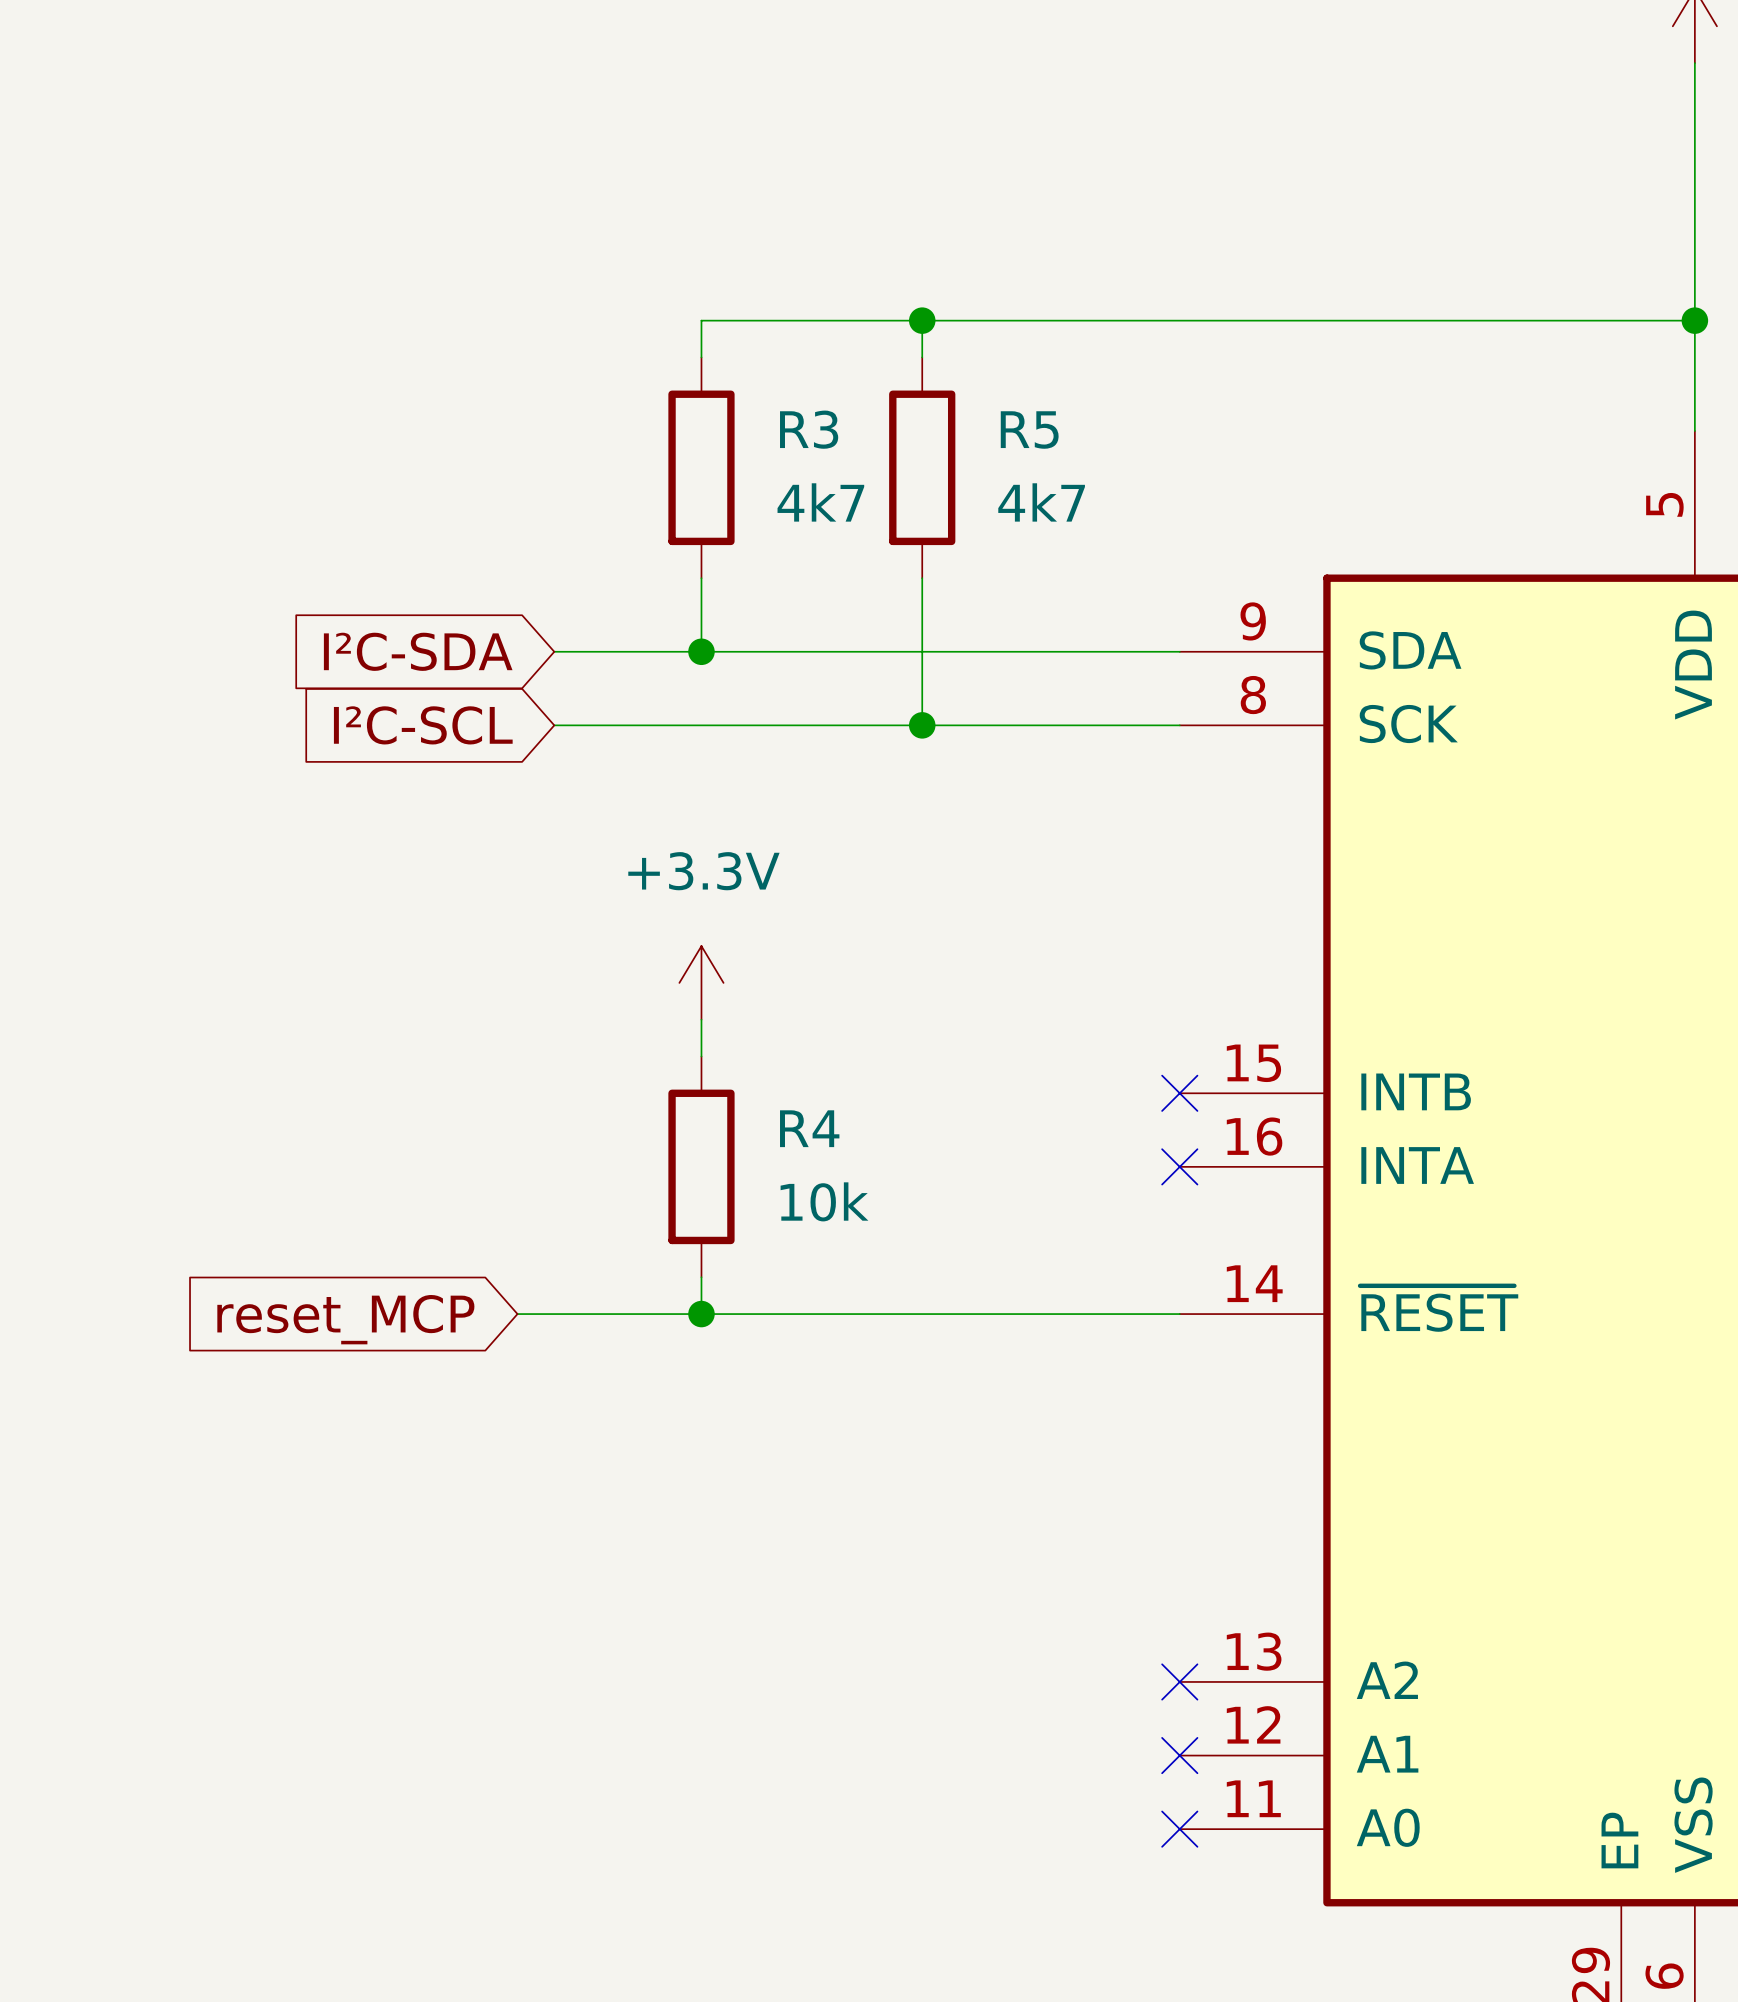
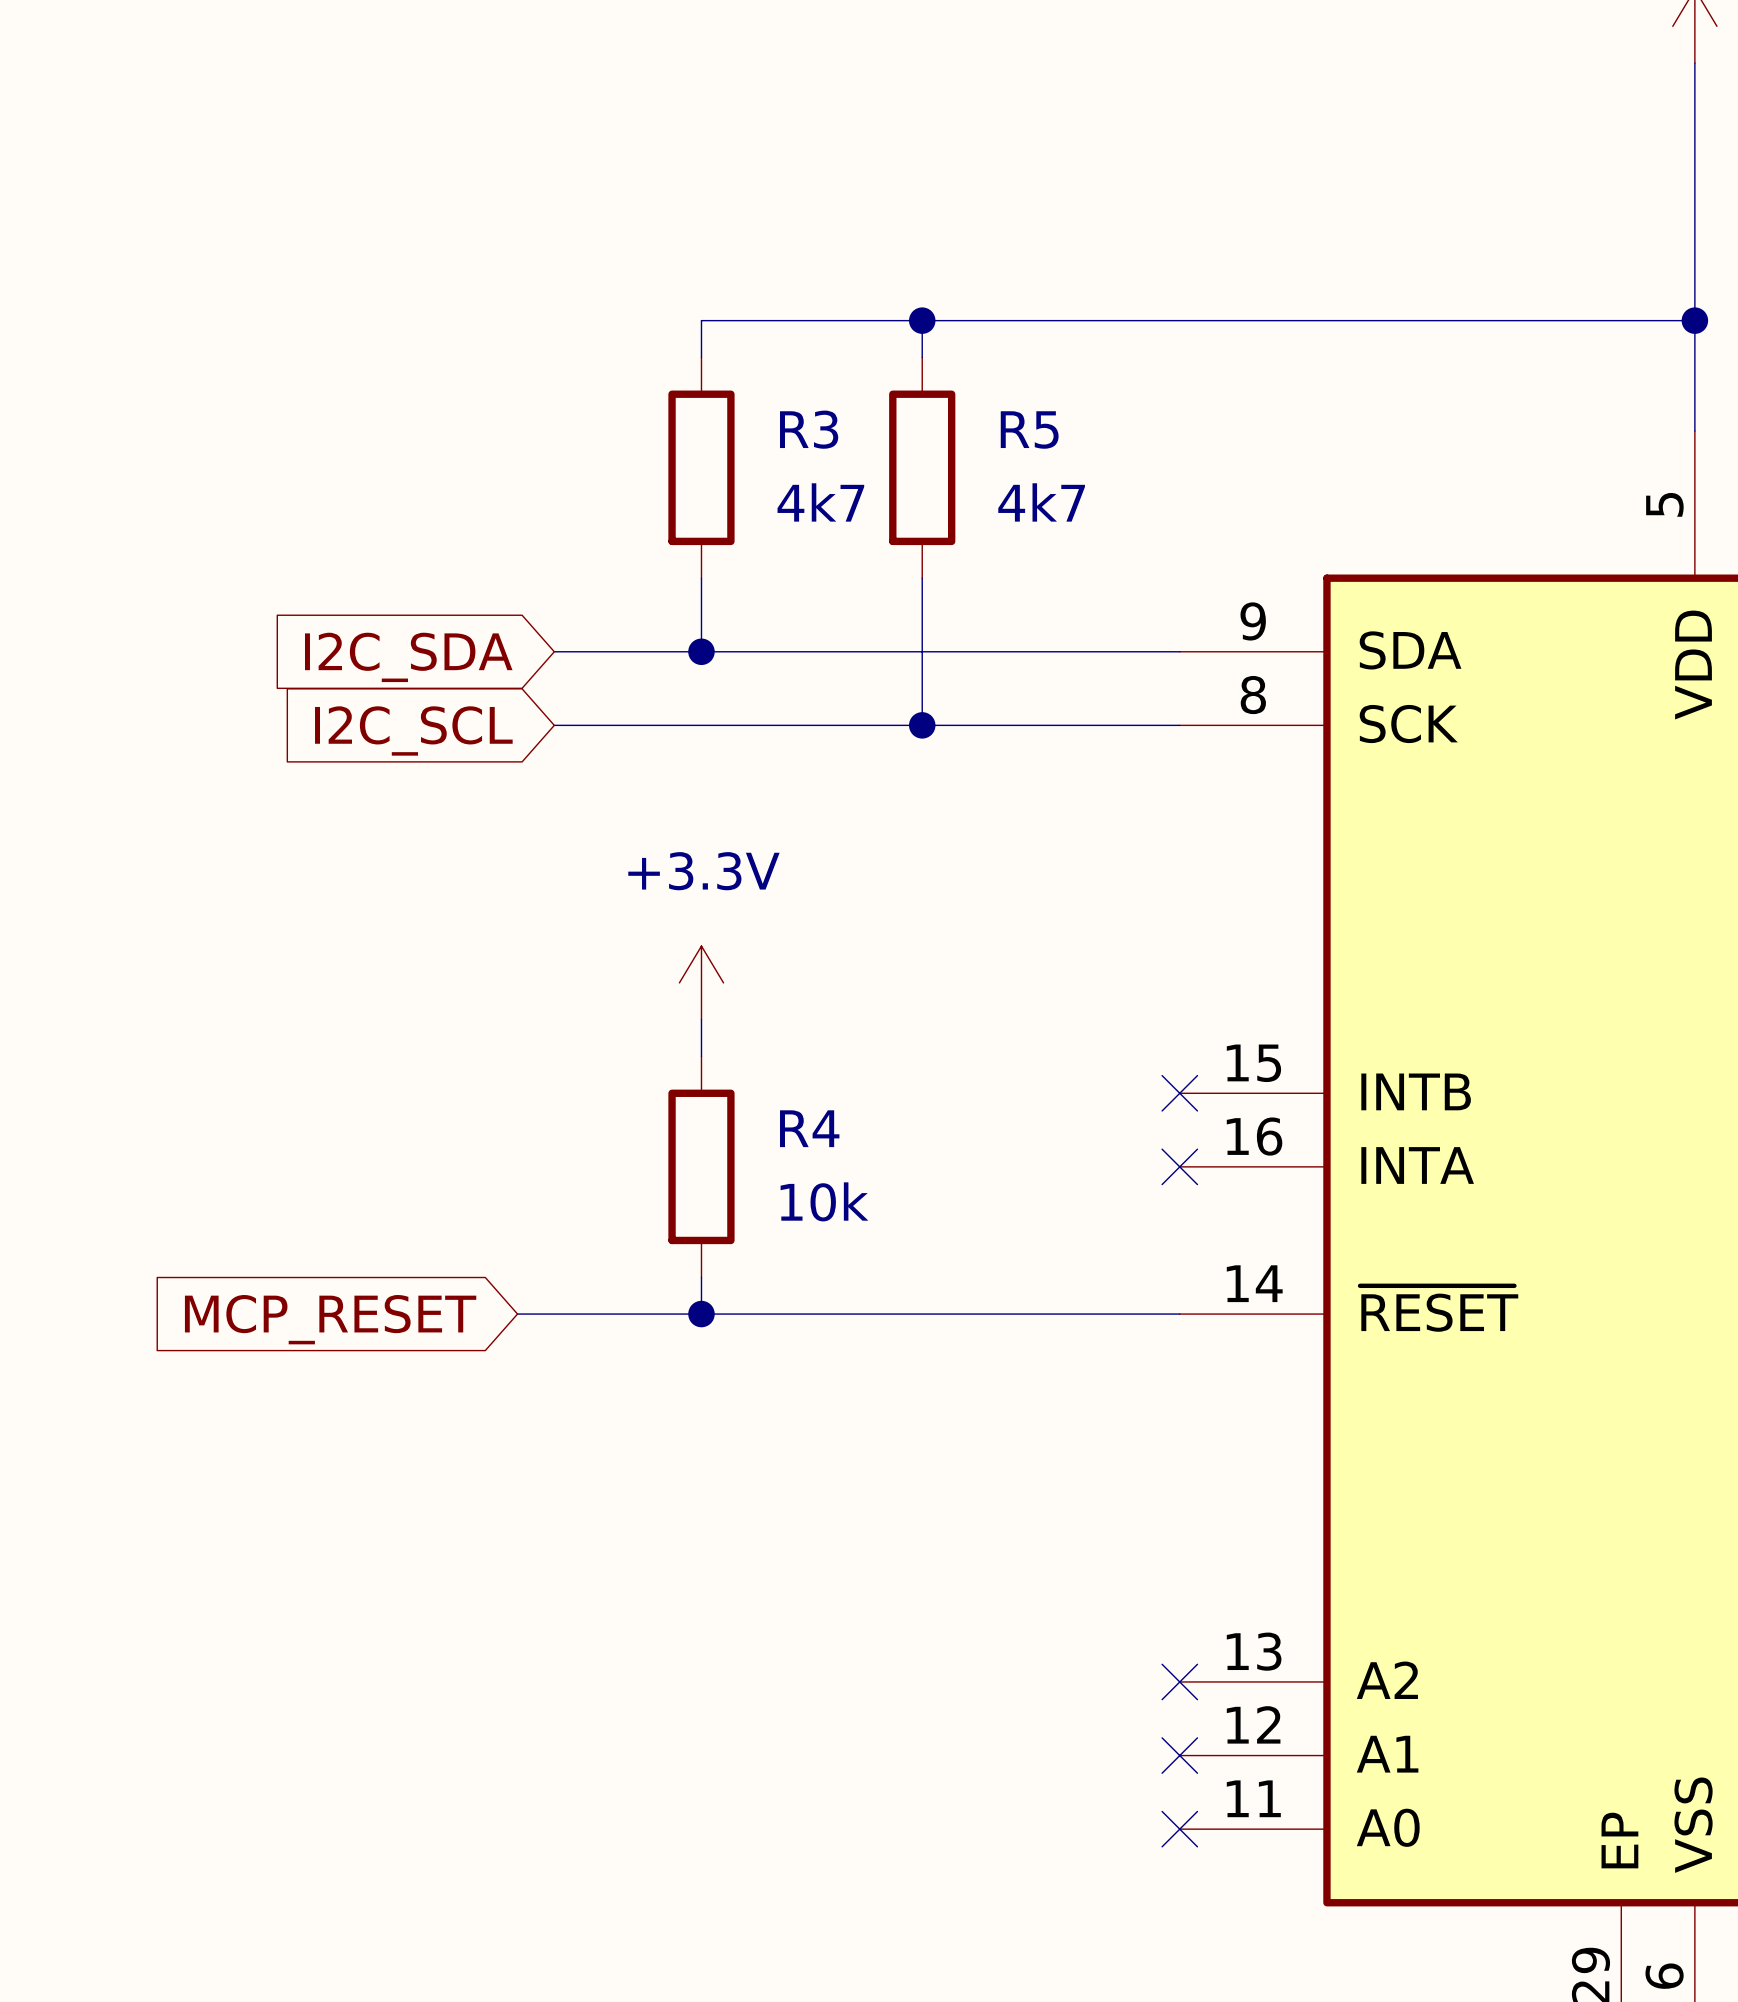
global label: I²C-SDA (418, 651) -> I2C_SDA (408, 657)
global label: I²C-SCL (423, 725) -> I2C_SCL (413, 730)
global label: reset_MCP (345, 1319) -> MCP_RESET (330, 1319)

